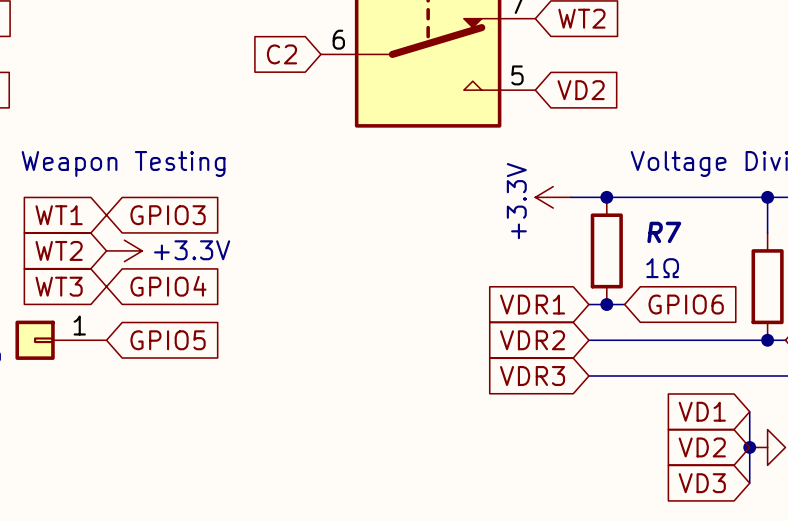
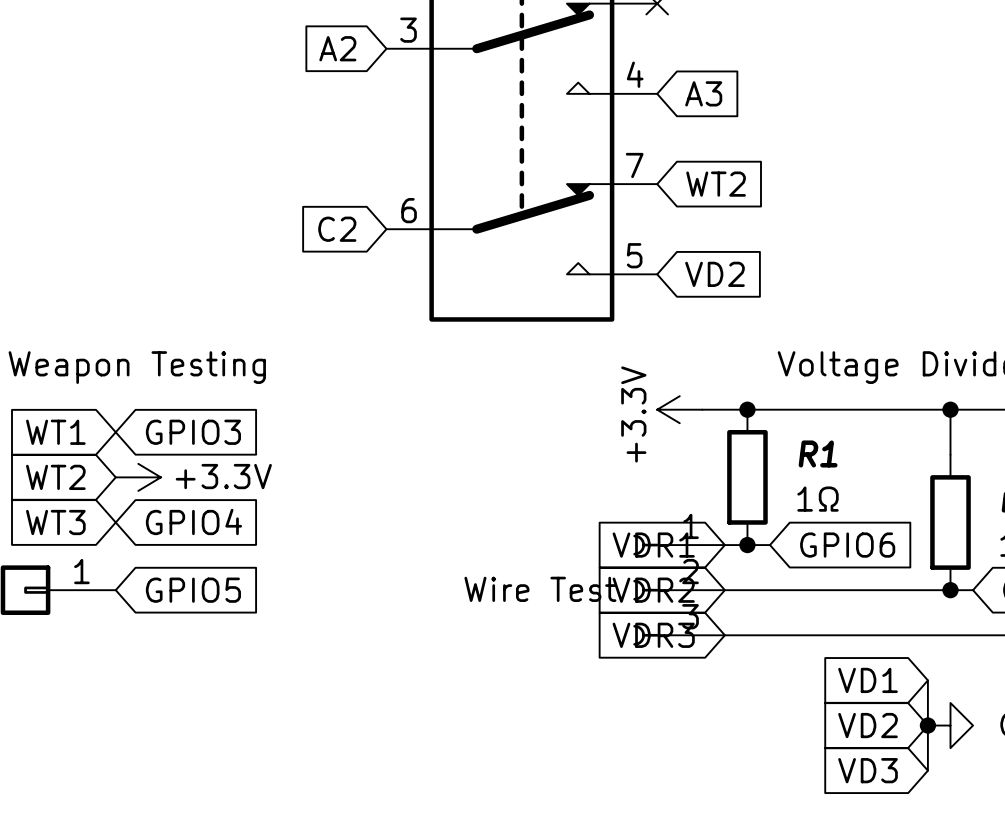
R7 name: R7 (664, 232) -> R1 (818, 453)
part: none -> Wire Test (679, 590)

